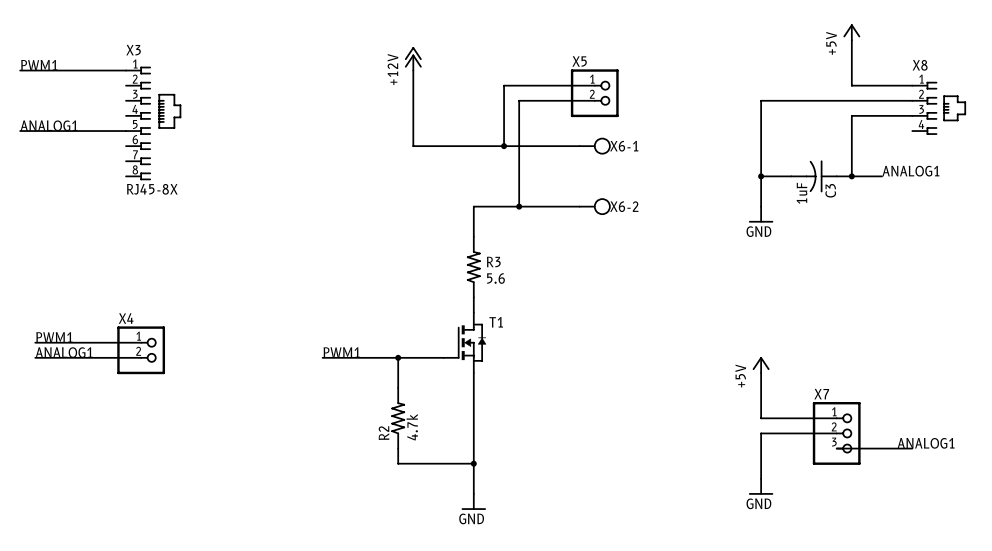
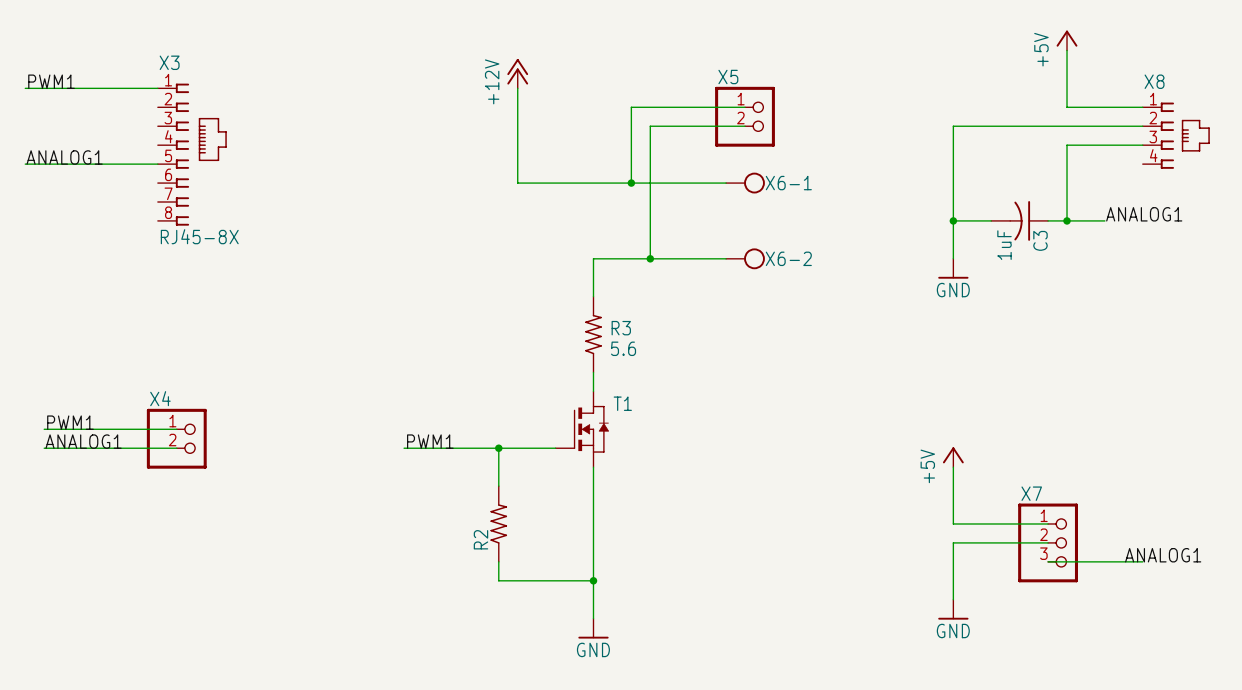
R2 value: 4.7k (412, 427) -> none

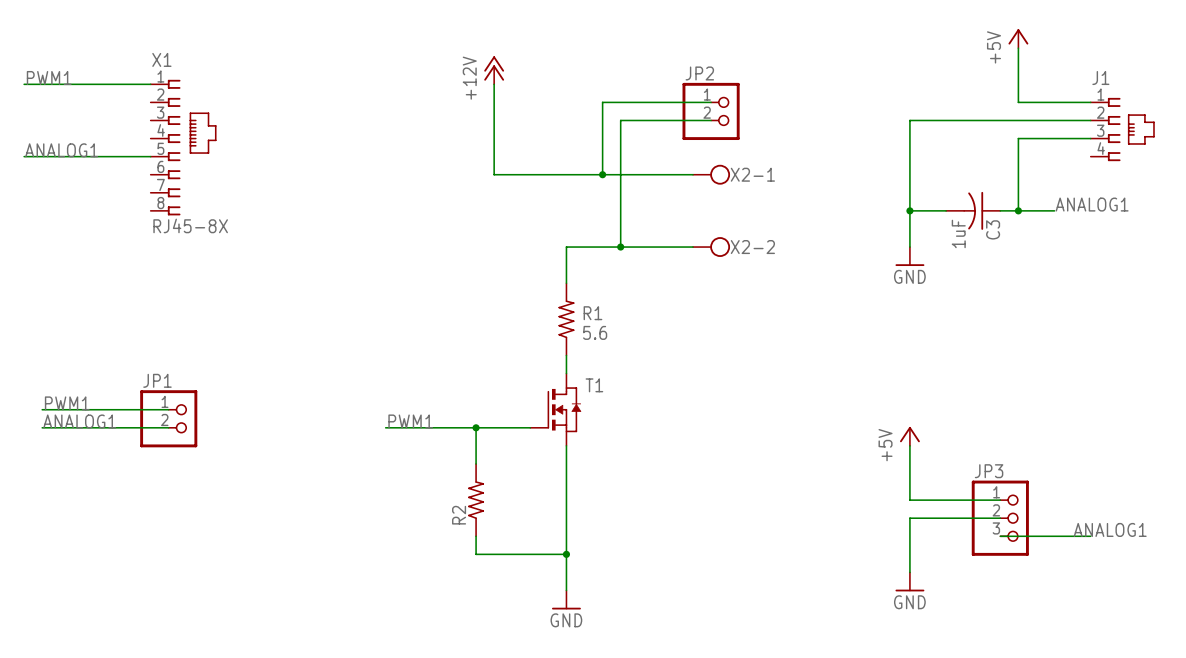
X3 name: X3 (169, 62) -> X1 (161, 59)
X5 name: X5 (728, 76) -> JP2 (699, 73)
X8 name: X8 (1154, 81) -> J1 (1100, 78)
X6-1 name: X6-1 (788, 183) -> X2-1 (752, 174)
X6-2 name: X6-2 (788, 258) -> X2-2 (752, 247)
R3 name: R3 (621, 328) -> R1 (592, 313)
X4 name: X4 (160, 398) -> JP1 (157, 380)
X7 name: X7 (1031, 493) -> JP3 (989, 471)

